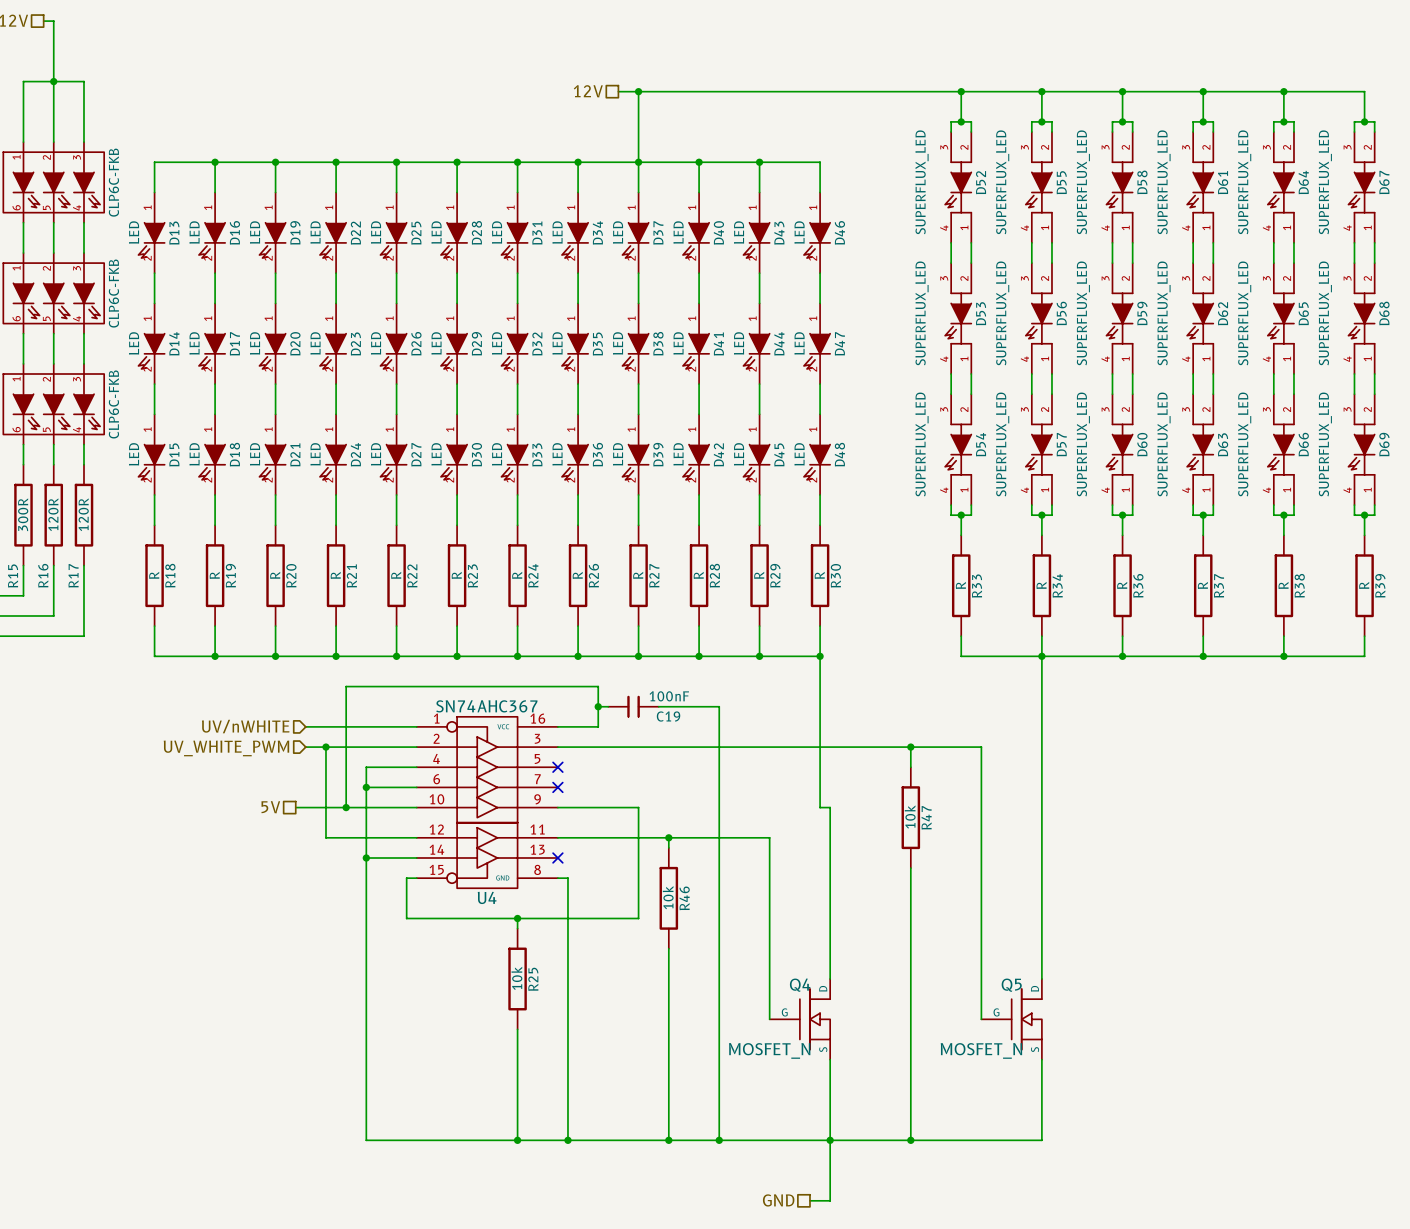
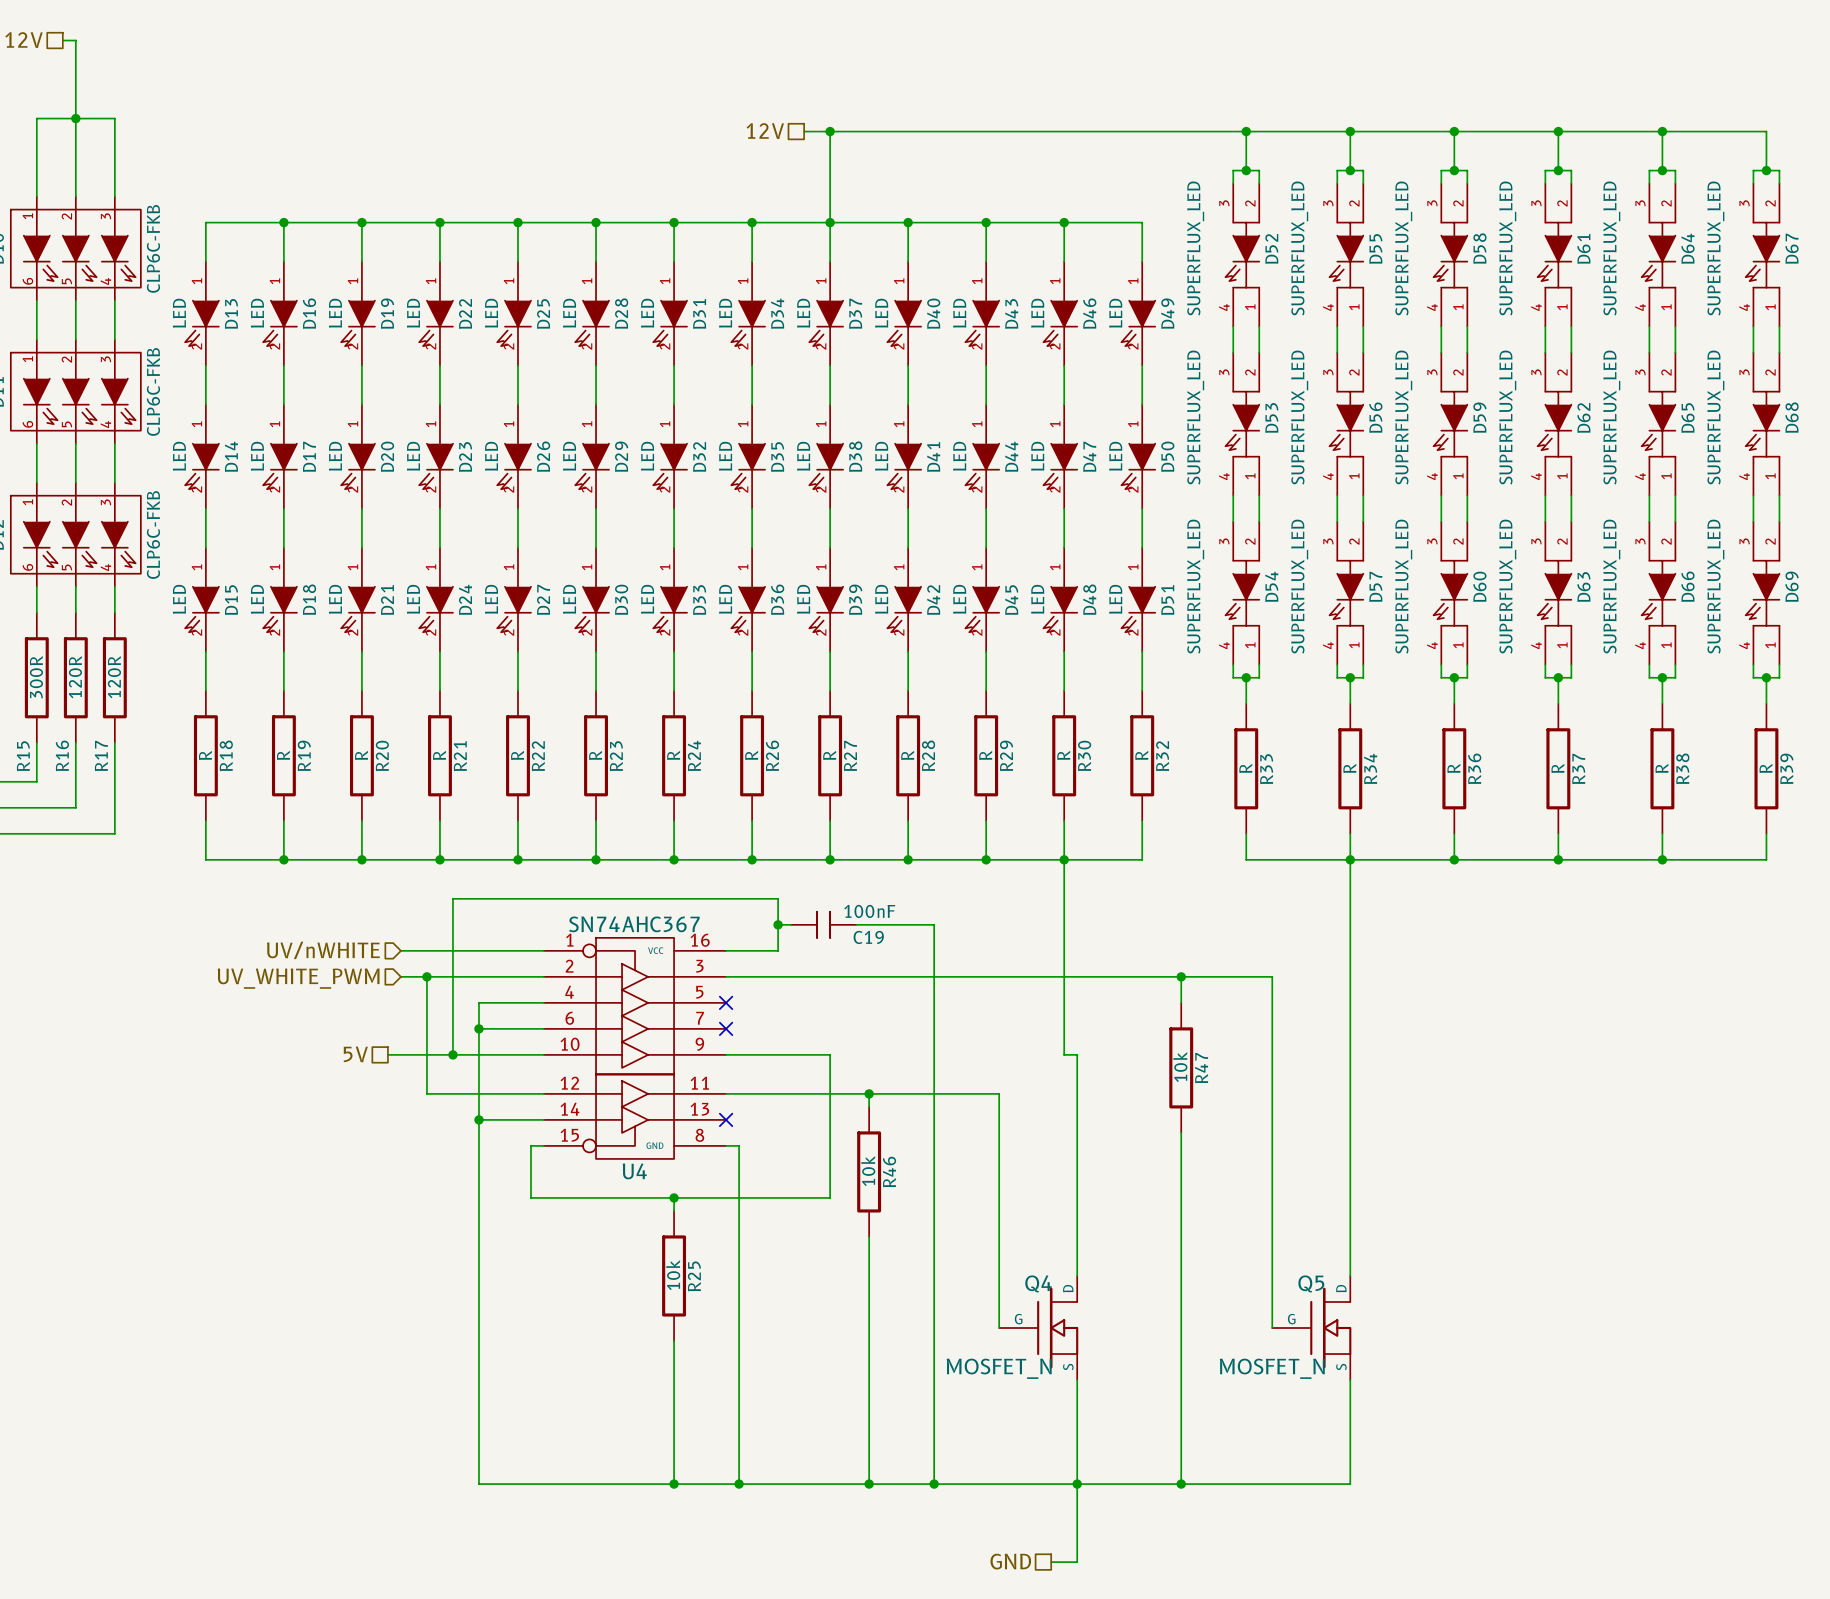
wire: none -> (1064, 222) (1142, 222) (1142, 261)
junction: none -> (1064, 222)
D49: none -> LED (1138, 313)
wire: none -> (1142, 365) (1142, 404)
D50: none -> LED (1138, 456)
wire: none -> (1142, 508) (1142, 547)
D51: none -> LED (1138, 599)
wire: none -> (1142, 651) (1142, 690)
R32: none -> R (1142, 755)
wire: none -> (1142, 820) (1142, 859) (1064, 859)

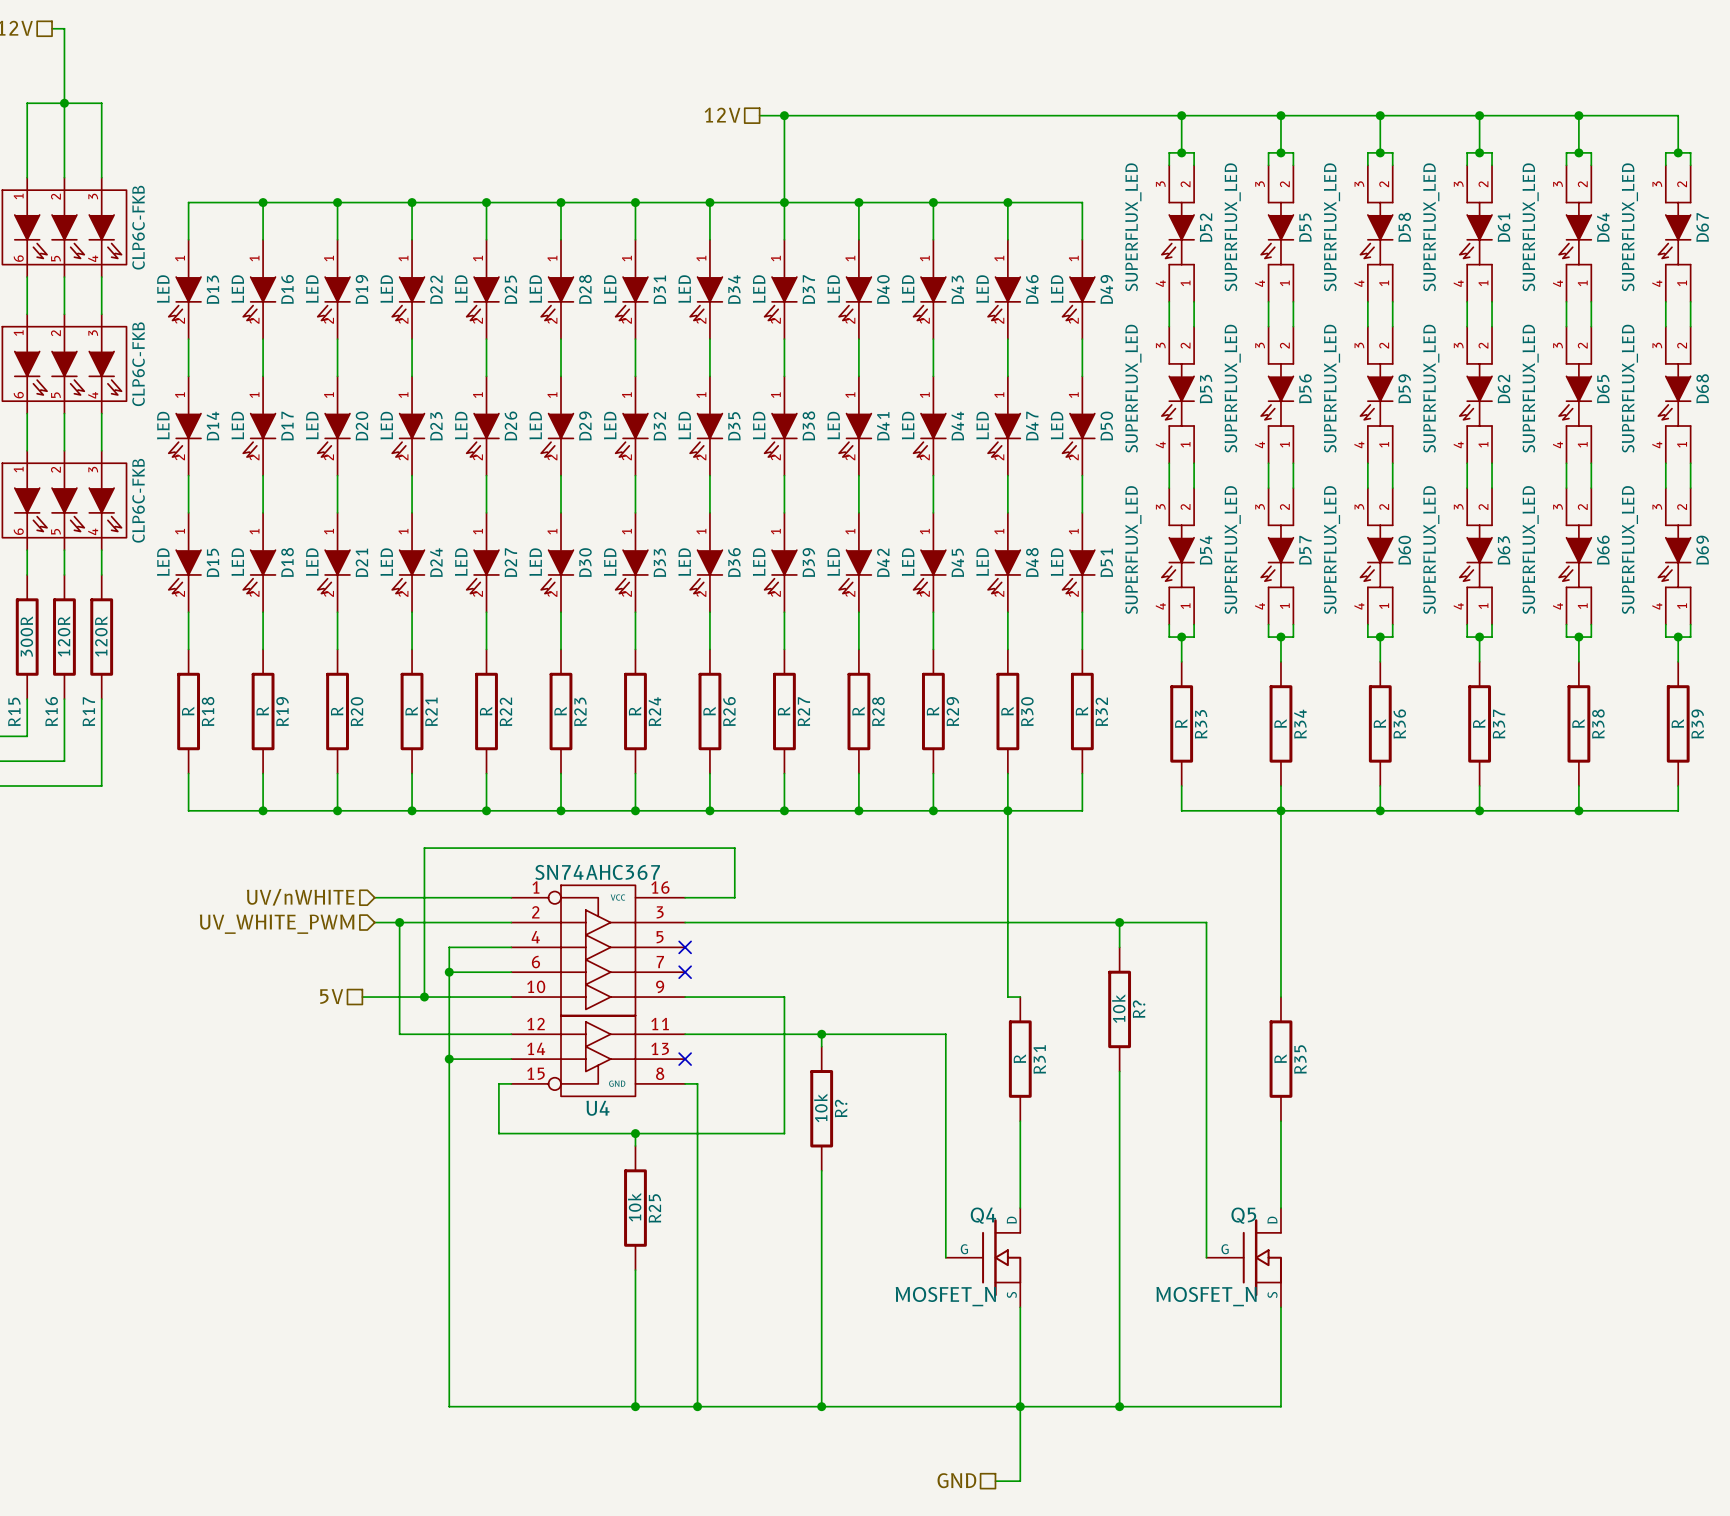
wire: (778, 924) (791, 924) -> none
junction: (778, 924) -> none
C19: 100nF (823, 924) -> none
wire: (856, 924) (934, 924) (934, 1484) -> none
wire: (1077, 1054) (1077, 1184) -> none
wire: (1350, 1054) (1350, 1184) -> none
R47 name: R47 (1201, 1068) -> R? (1139, 1009)
R31: none -> R (1020, 1059)
R35: none -> R (1280, 1059)
R46 name: R46 (889, 1172) -> R? (841, 1108)
junction: (934, 1484) -> none

